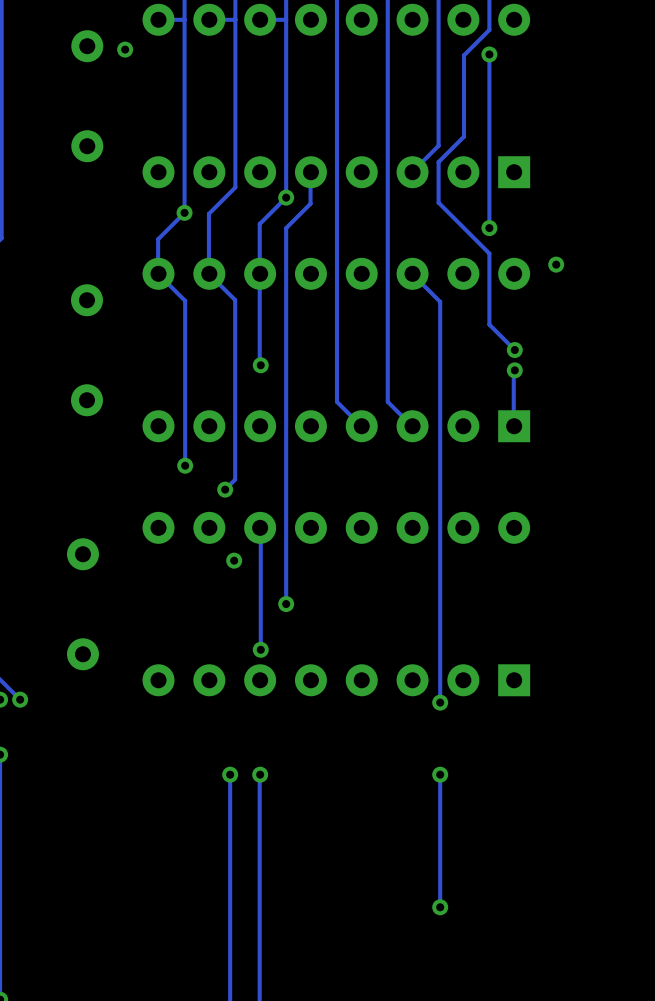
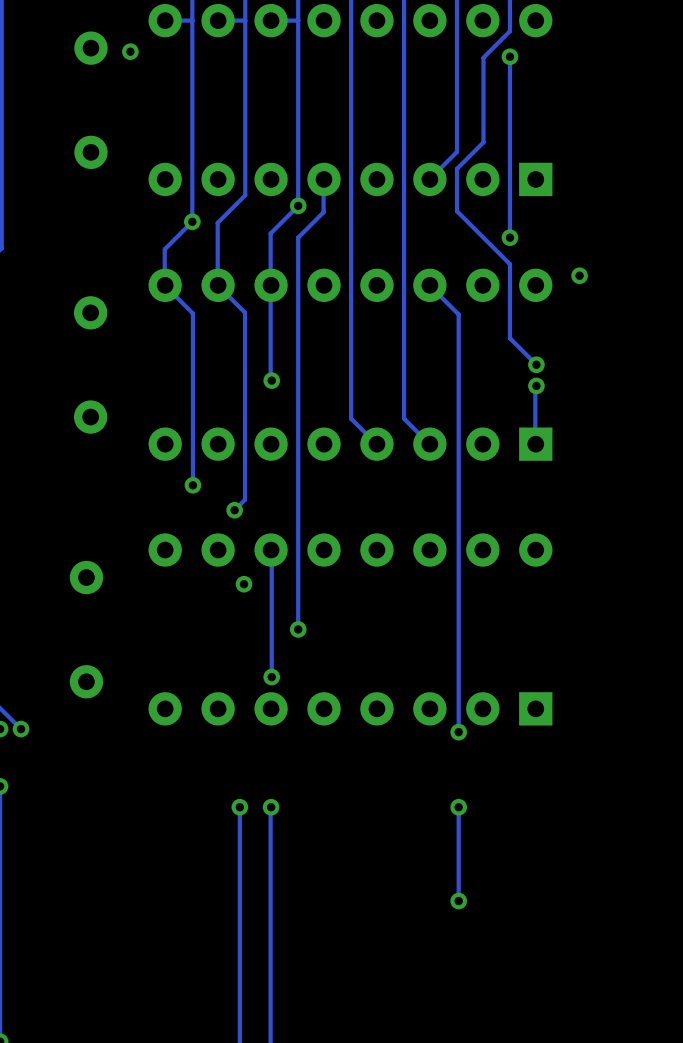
track: (440, 864) (440, 907) -> none
via position: (440, 907) -> (458, 901)

